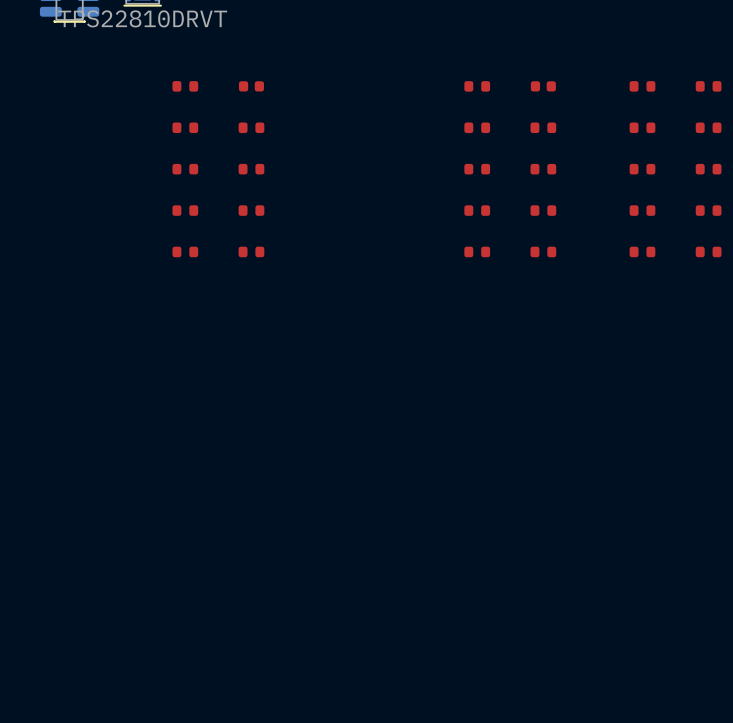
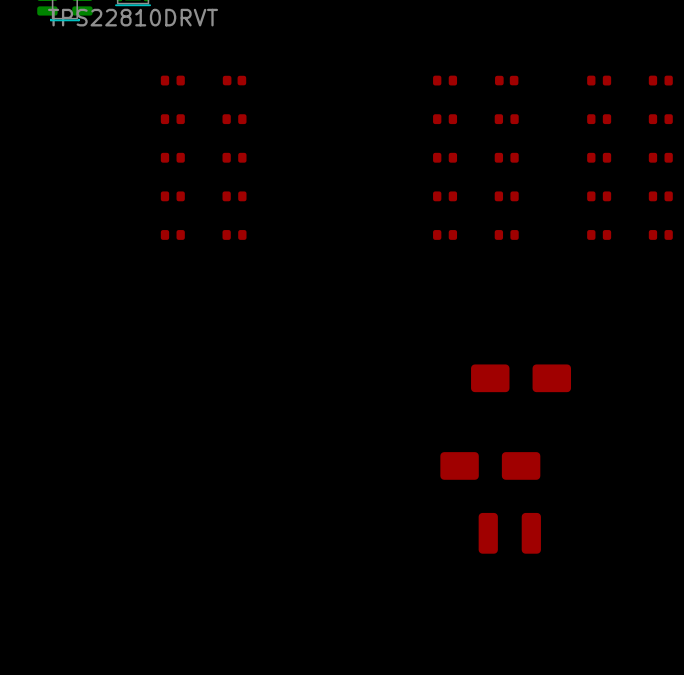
part: none -> (521, 378)
part: none -> (490, 465)
part: none -> (509, 533)

